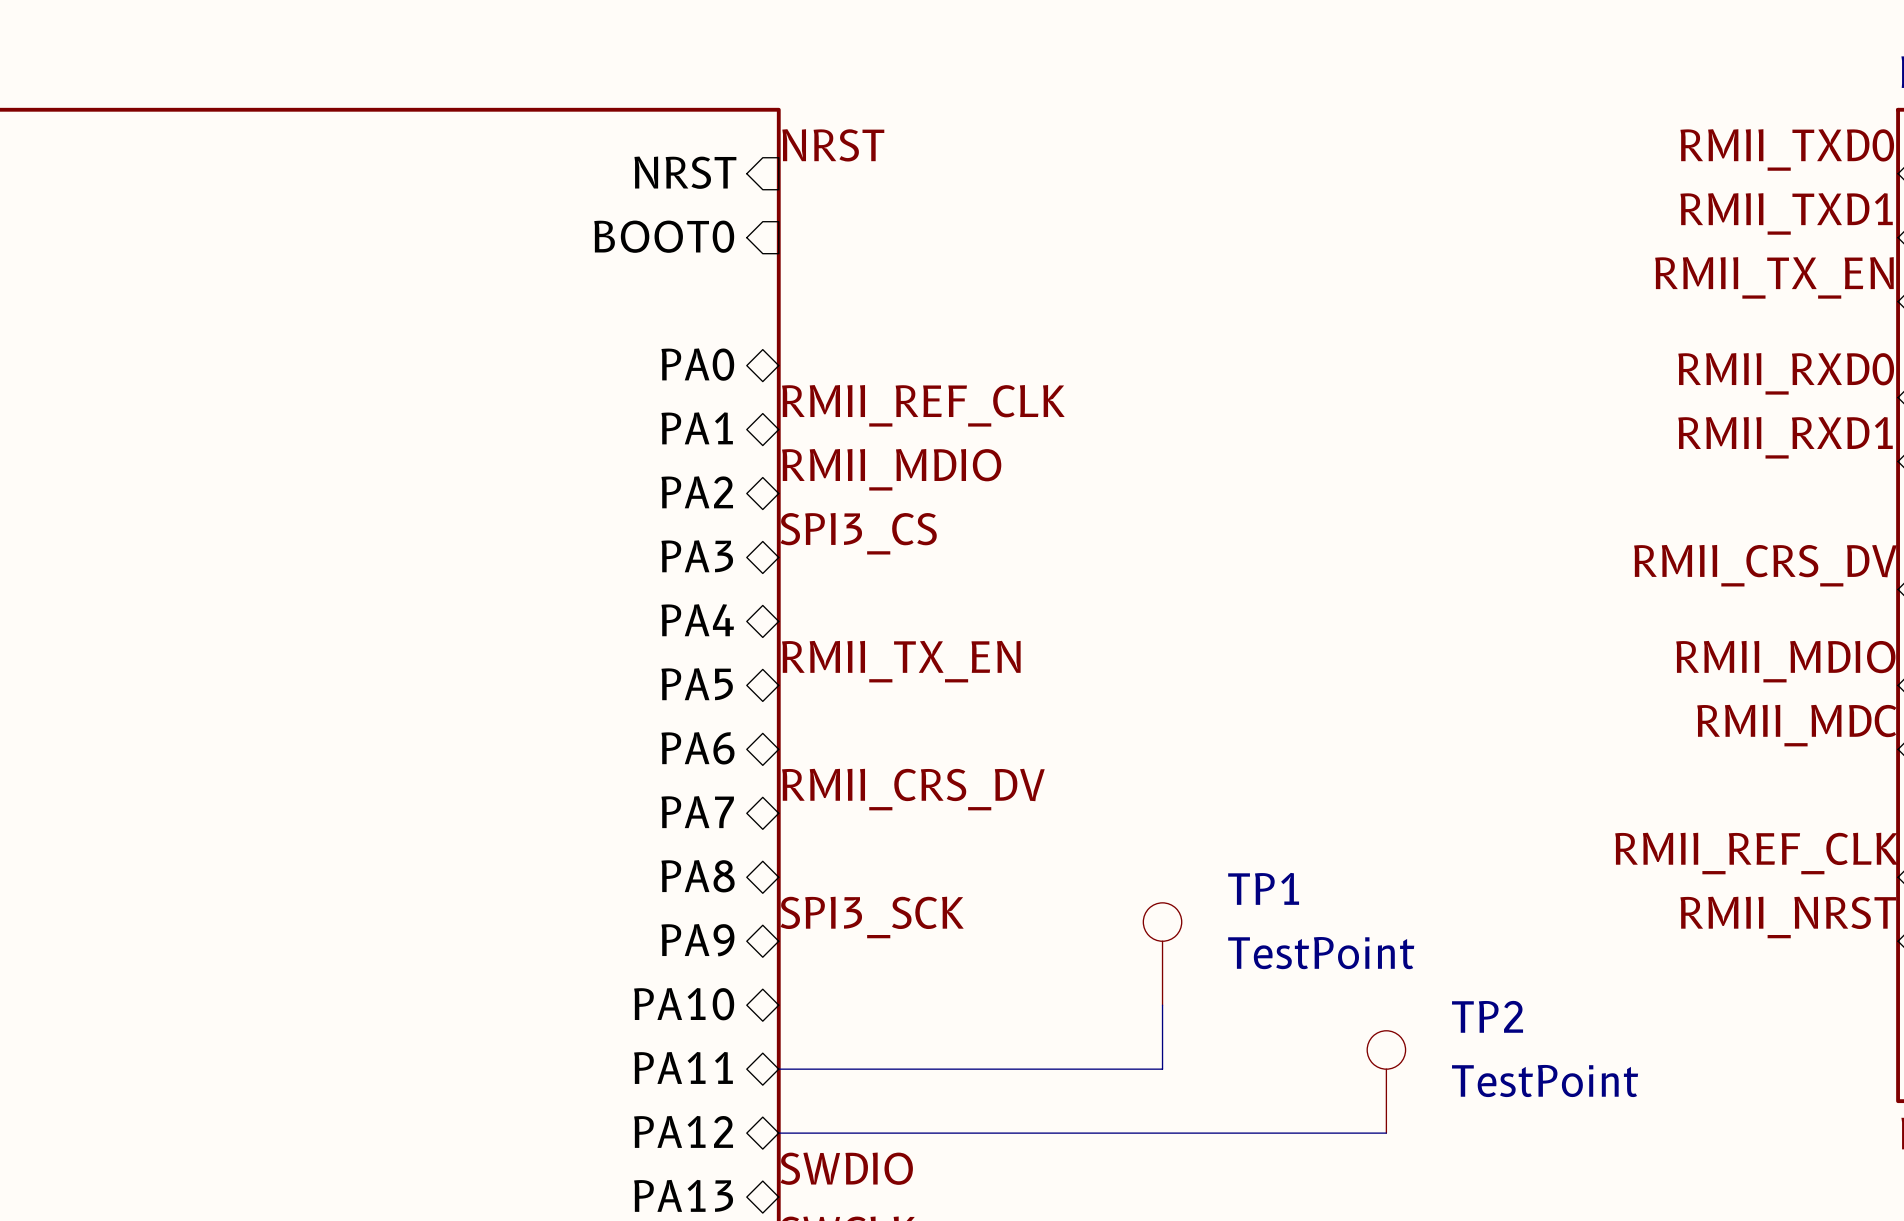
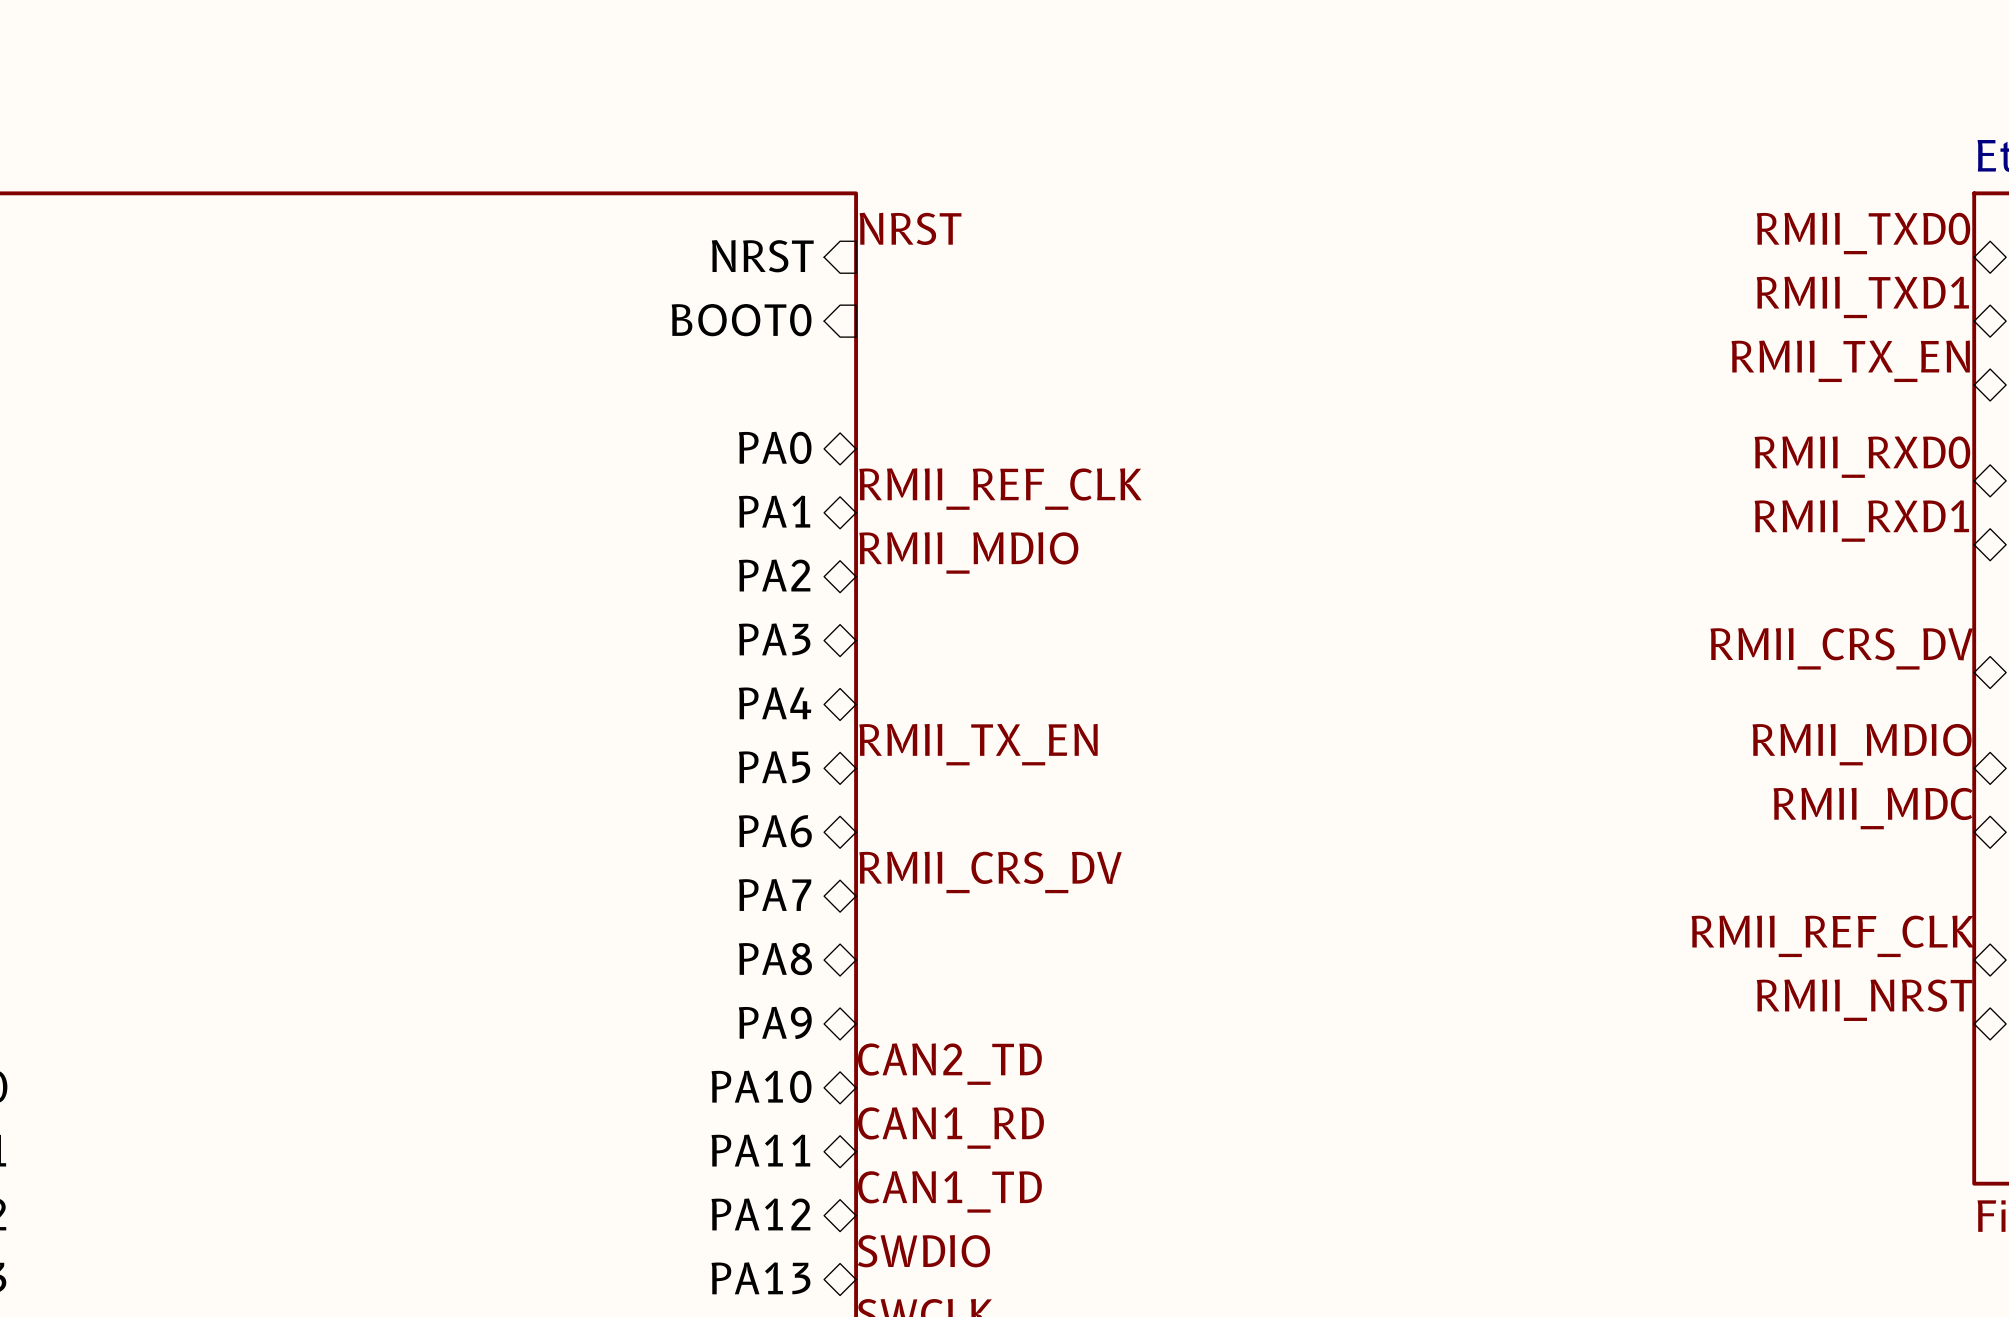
label: SPI3_CS (858, 533) -> none
label: SPI3_SCK (872, 917) -> none
TP1: TestPoint (1162, 954) -> none
label: none -> CAN2_TD (949, 1064)
wire: (1162, 1005) (1162, 1069) (778, 1069) -> none
label: none -> CAN1_RD (950, 1128)
TP2: TestPoint (1386, 1081) -> none
label: none -> CAN1_TD (949, 1191)
wire: (778, 1133) (1386, 1133) -> none

